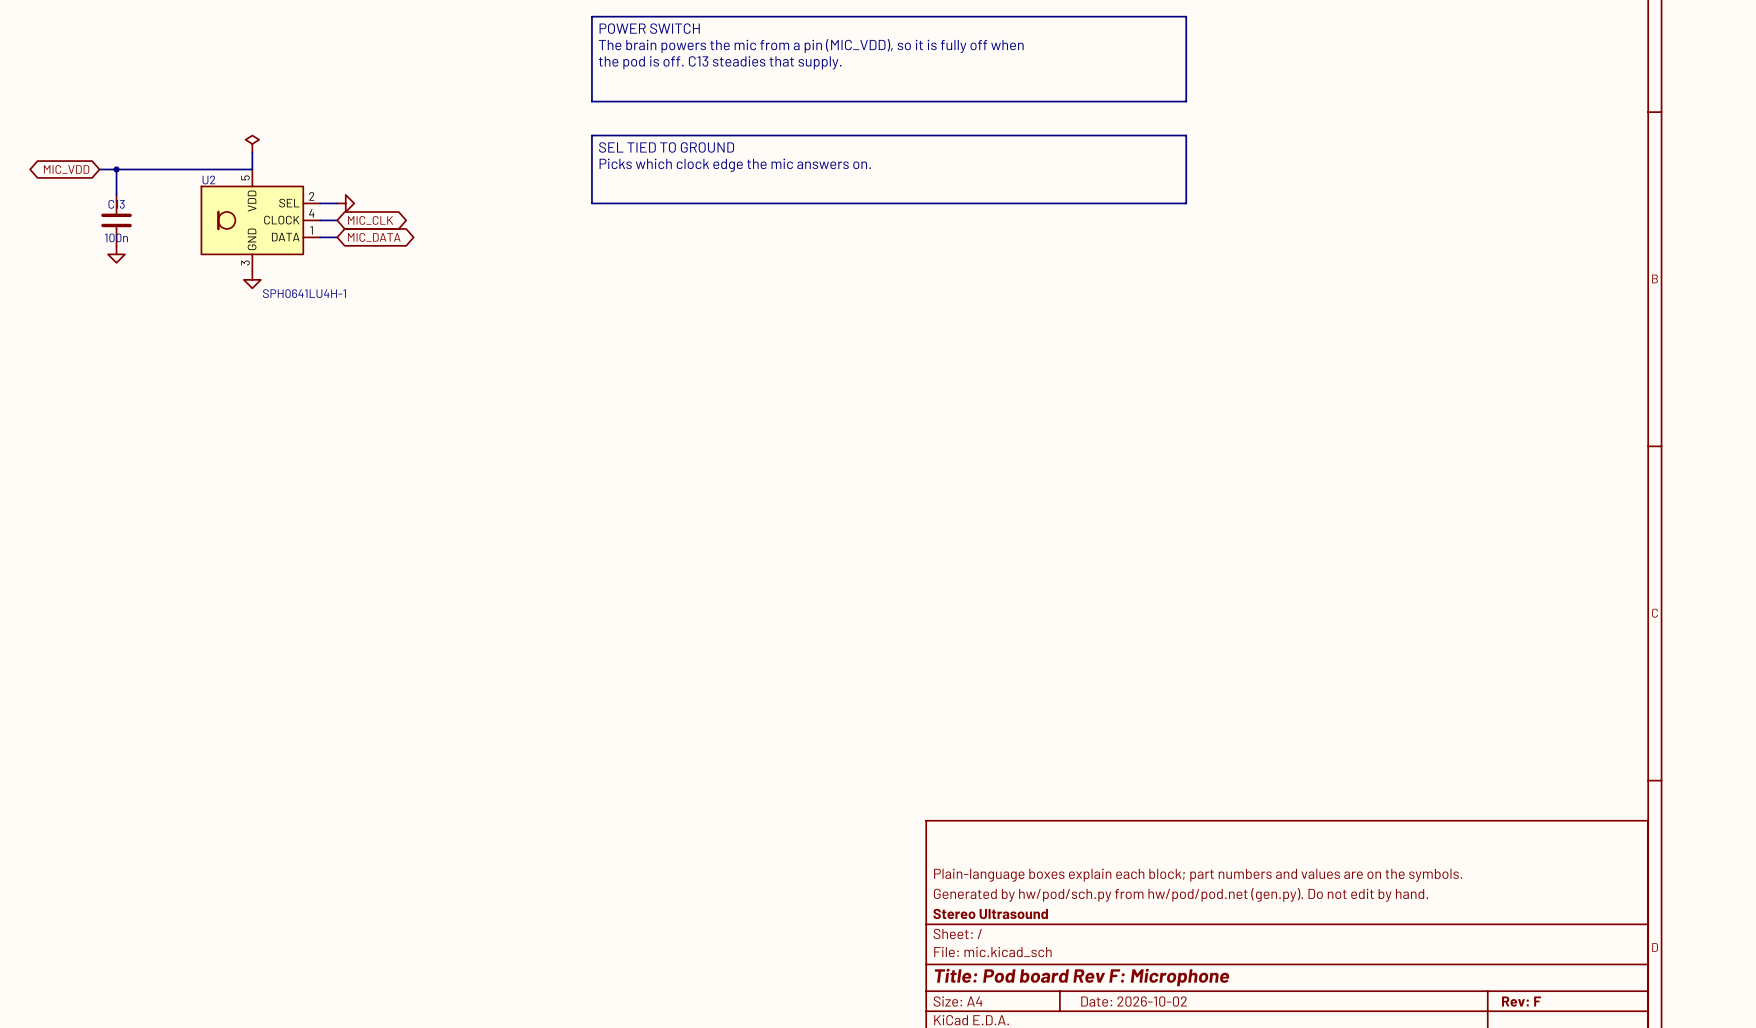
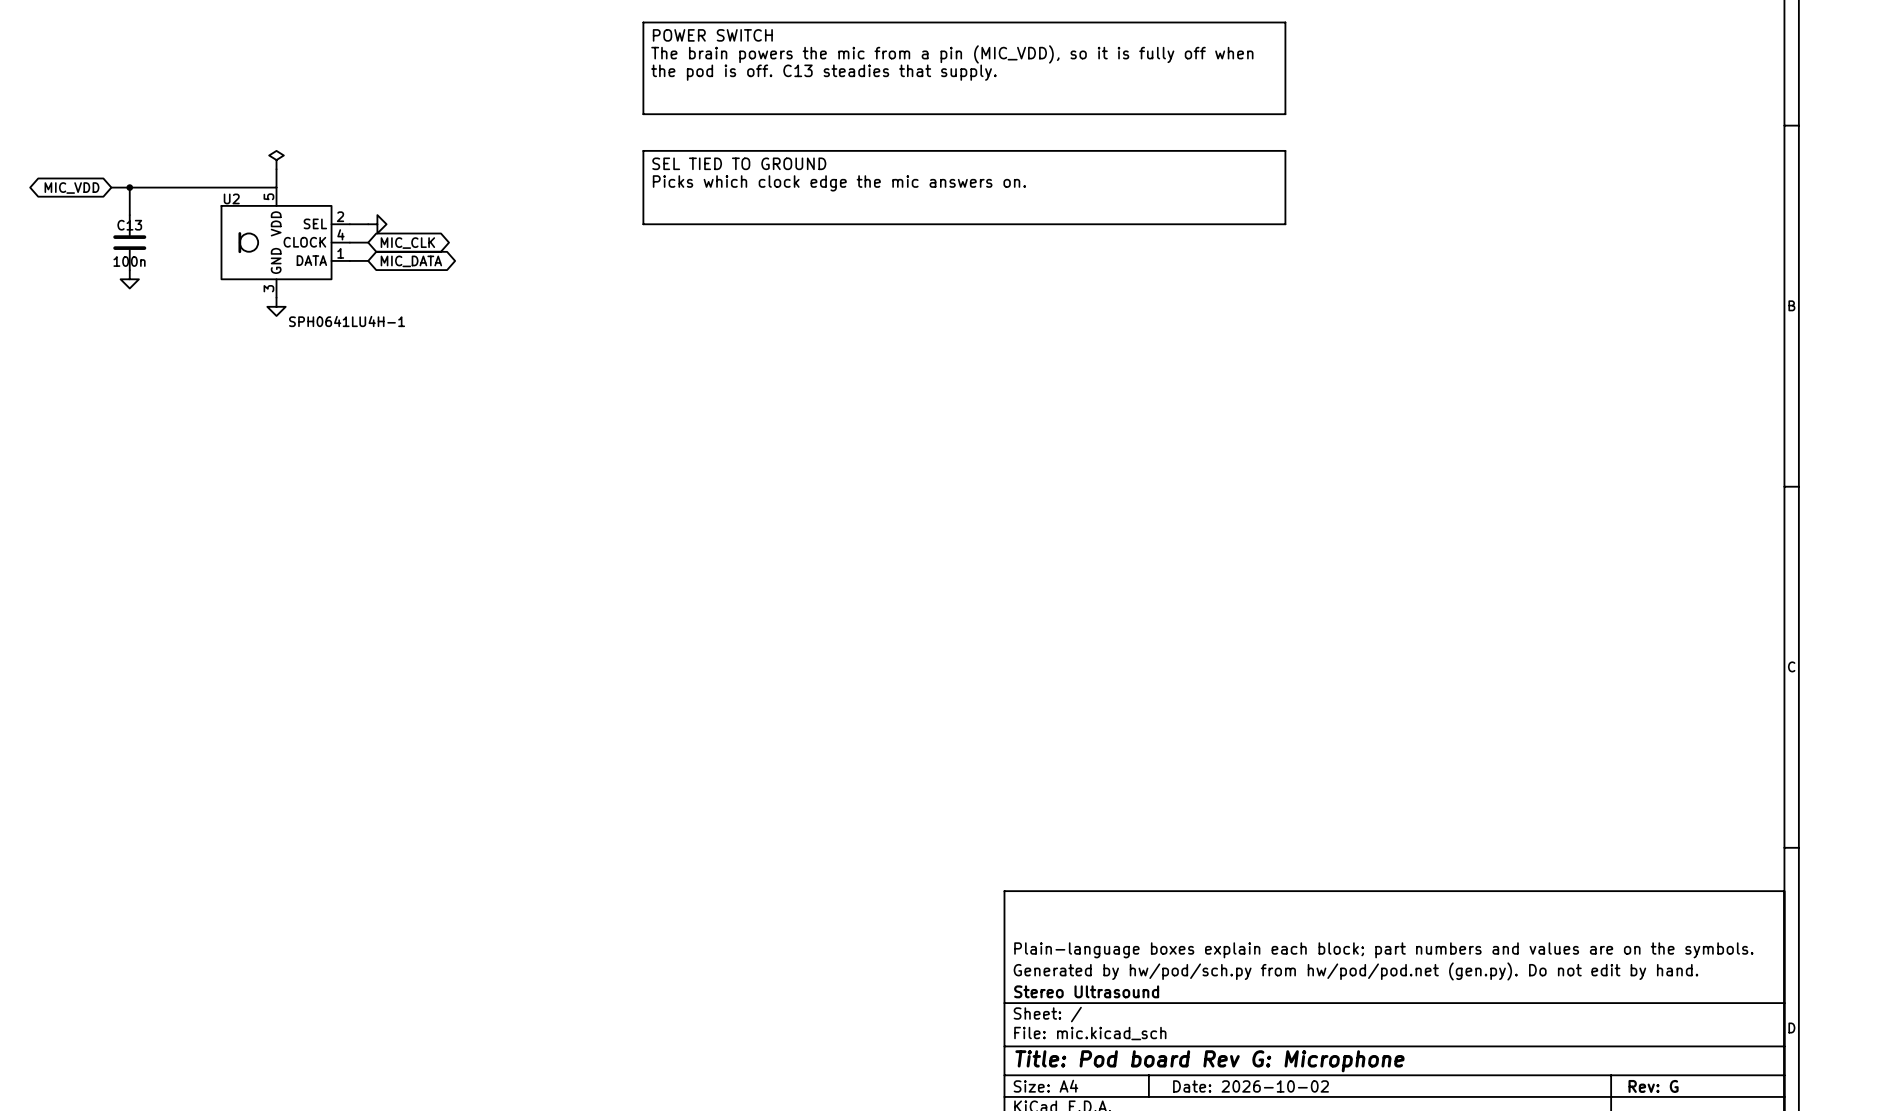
title block: Title: Pod board Rev F: Microphone (1081, 977) -> Title: Pod board Rev G: Microphone (1209, 1061)
title block: Rev: F (1521, 1001) -> Rev: G (1653, 1086)

